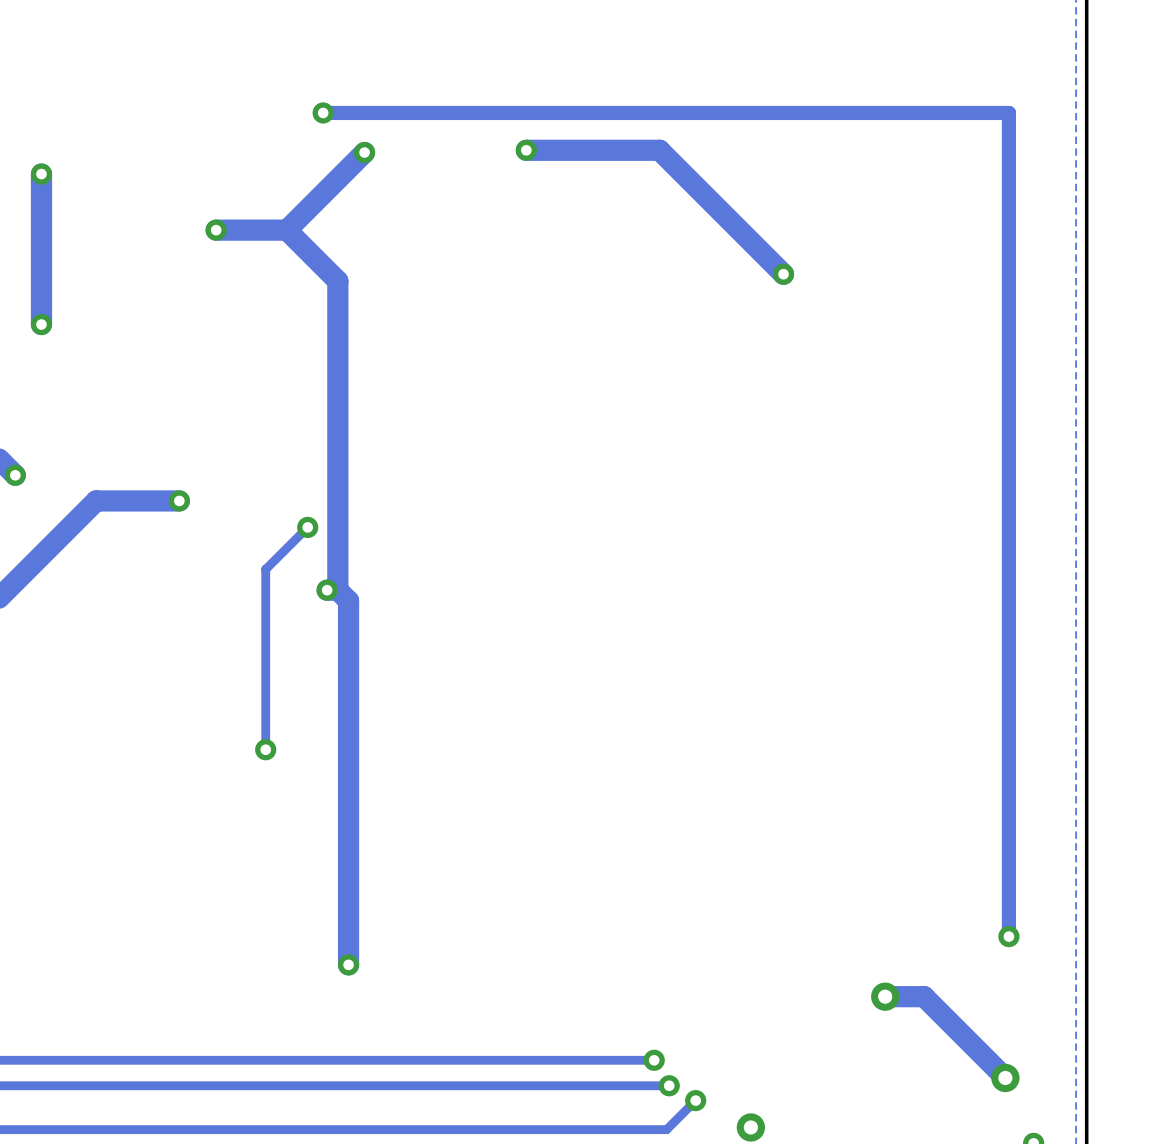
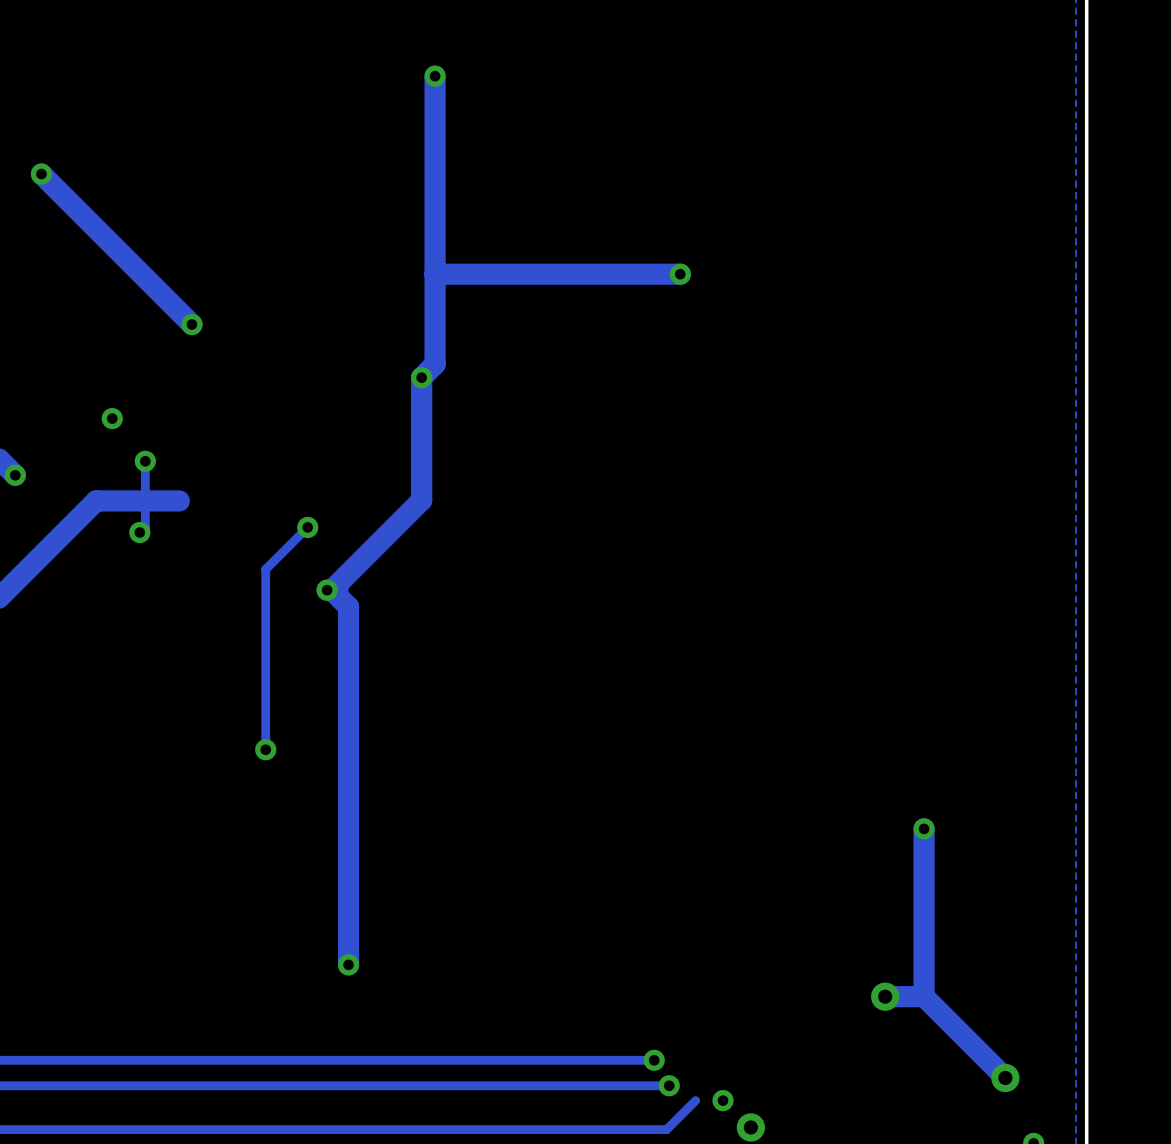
via: none -> (435, 76)
track: (323, 112) (1008, 112) (1008, 936) -> none
via: (323, 112) -> none
track: (526, 150) (659, 150) (783, 274) -> none
via: (526, 150) -> none
track: (364, 152) (286, 230) -> none
via: (364, 152) -> none
track: (41, 174) (41, 324) -> (41, 174) (191, 324)
via: (216, 230) -> none
track: (286, 230) (337, 281) (337, 590) (348, 600) (348, 606) -> (435, 76) (435, 364) (421, 377) (421, 500) (331, 590) (348, 606)
track: (286, 230) (216, 230) -> none
track: none -> (680, 274) (435, 274)
via: none -> (680, 274)
via: (783, 274) -> none
via: (41, 324) -> none
via: none -> (191, 324)
via: none -> (421, 377)
via: none -> (112, 418)
track: none -> (145, 461) (145, 527) (139, 532)
via: none -> (145, 461)
via: (179, 500) -> none
via: none -> (139, 532)
track: none -> (924, 828) (924, 996)
via position: (1008, 936) -> (924, 828)
via position: (695, 1100) -> (723, 1100)

